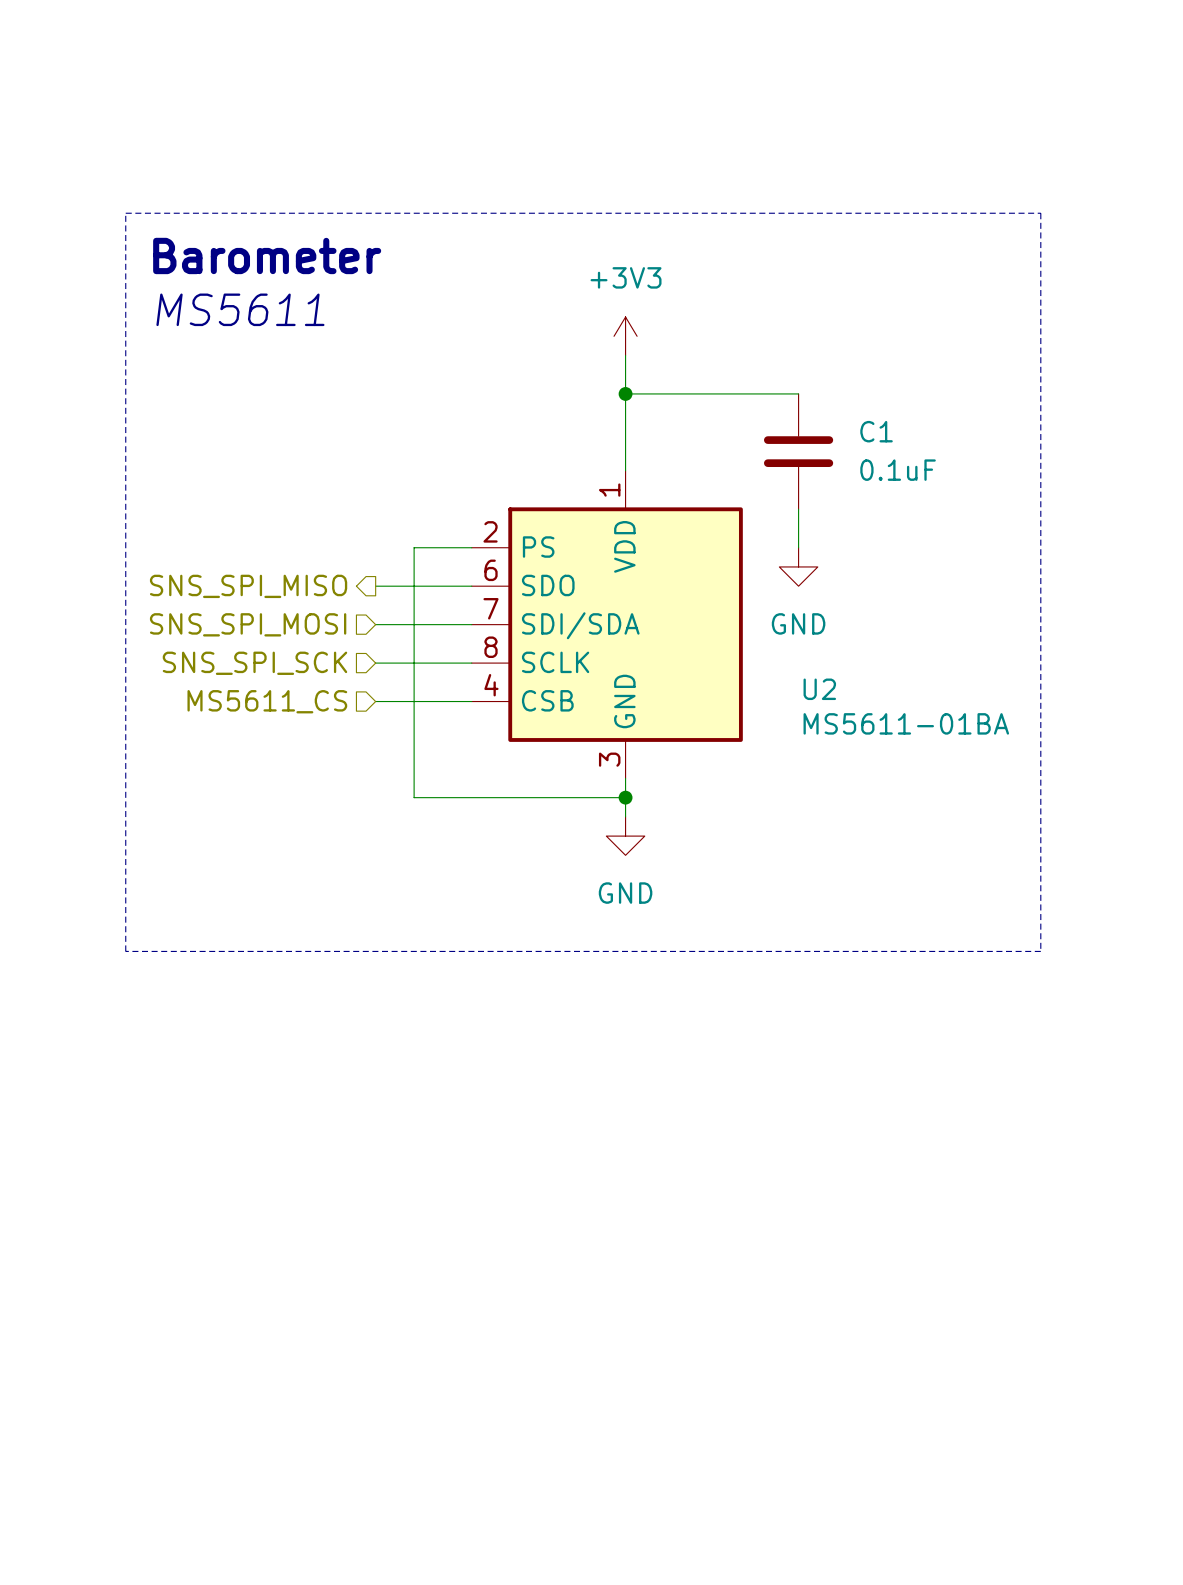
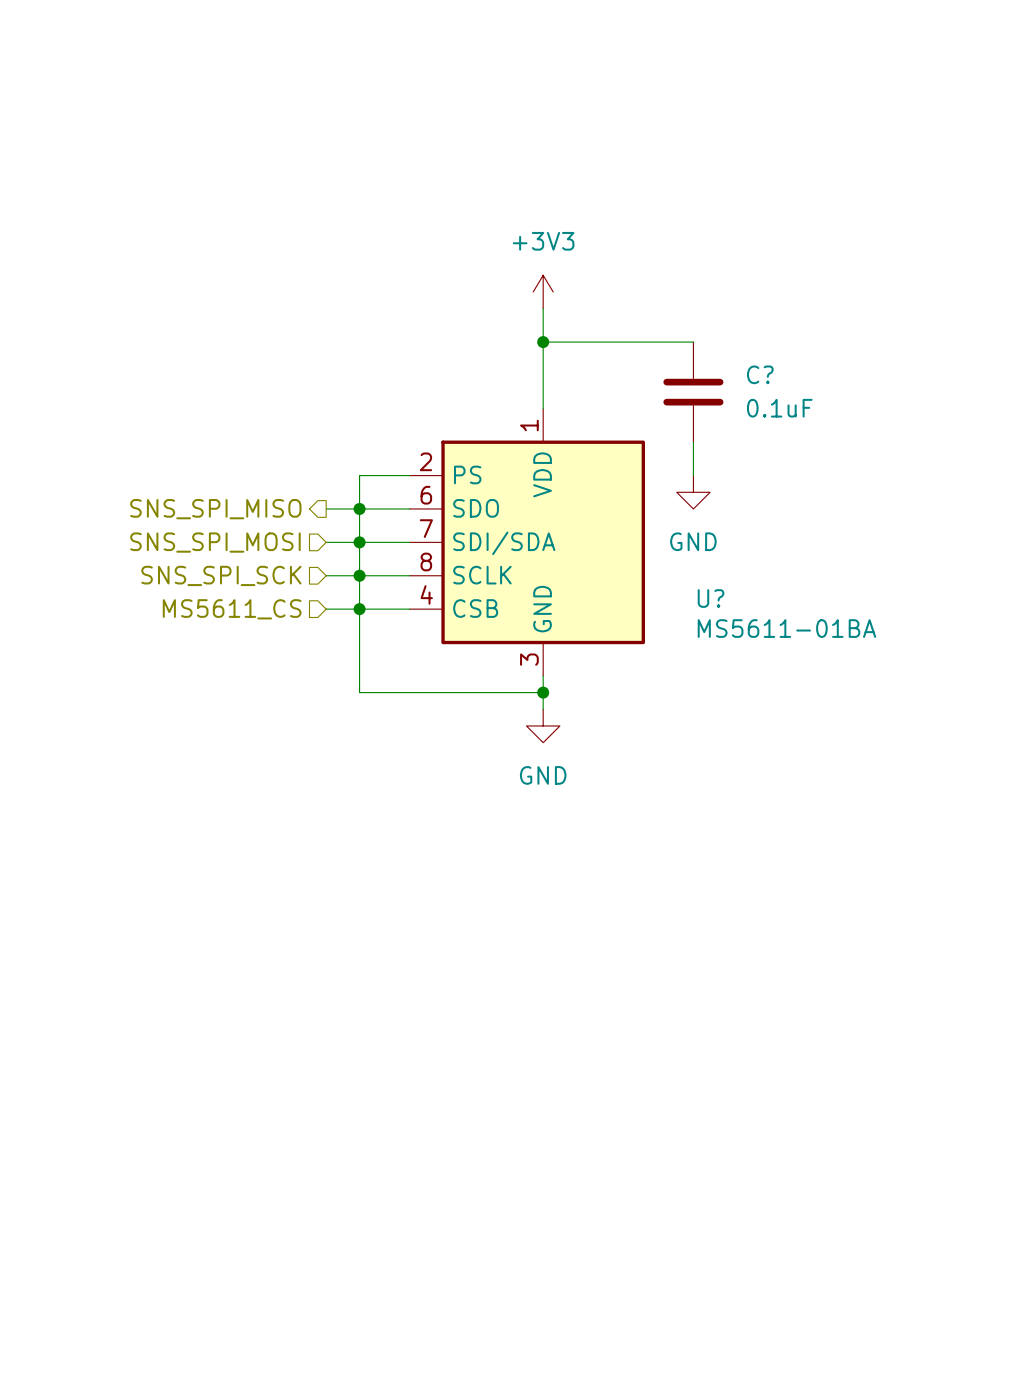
line: (125, 213) (1040, 213) (1040, 951) (125, 951) (125, 213) -> none
text: Barometer (267, 255) -> none
text: MS5611 (240, 309) -> none
C1 name: C1 (876, 431) -> C? (760, 374)
junction: none -> (359, 508)
junction: none -> (359, 542)
junction: none -> (359, 575)
U2 name: U2 (819, 689) -> U? (711, 598)
junction: none -> (359, 609)

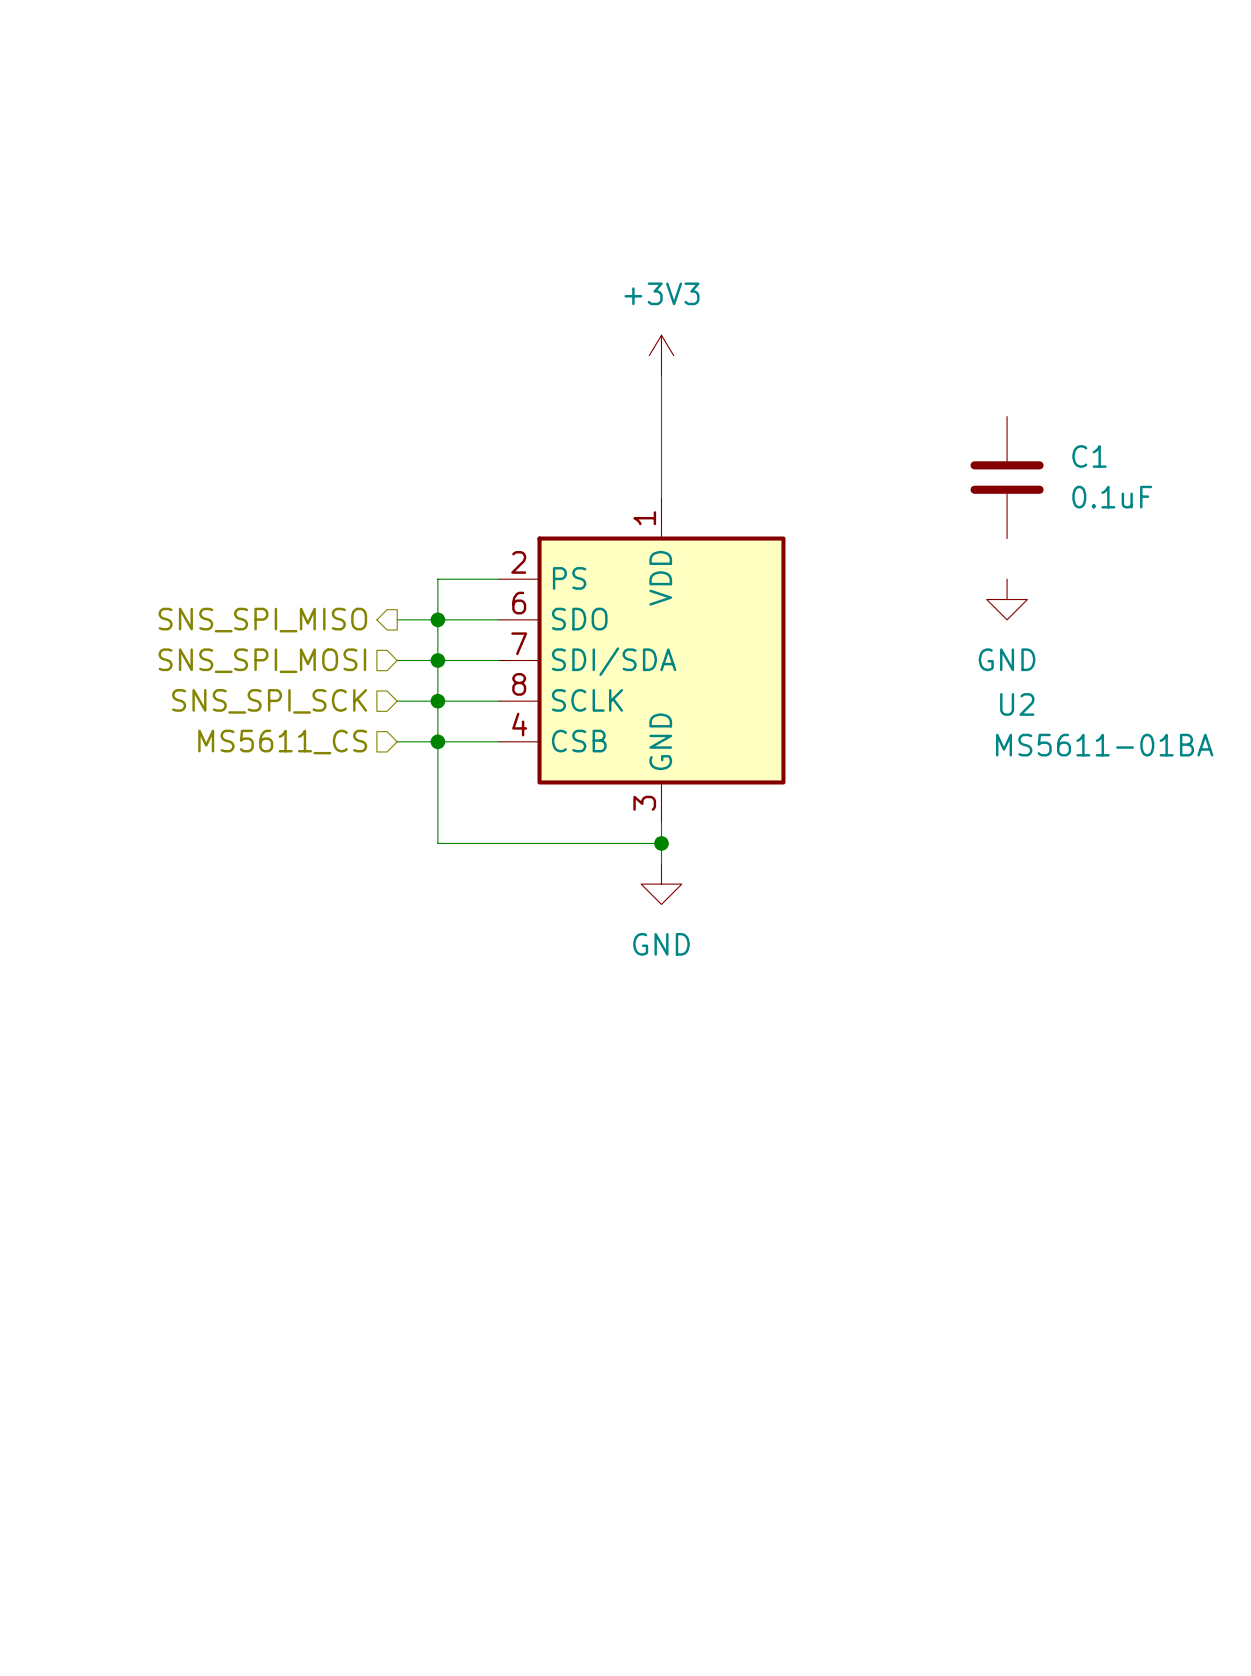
wire: (543, 342) (693, 342) -> none
junction: (543, 342) -> none
C?: 0.1uF (693, 392) -> none
C1: none -> 0.1uF (1007, 477)
wire: (693, 442) (693, 475) -> none
power symbol position: GND (693, 492) -> GND (1007, 599)
U? name: U? (711, 598) -> U2 (1017, 704)
U? value position: MS5611-01BA (786, 628) -> MS5611-01BA (1104, 745)

